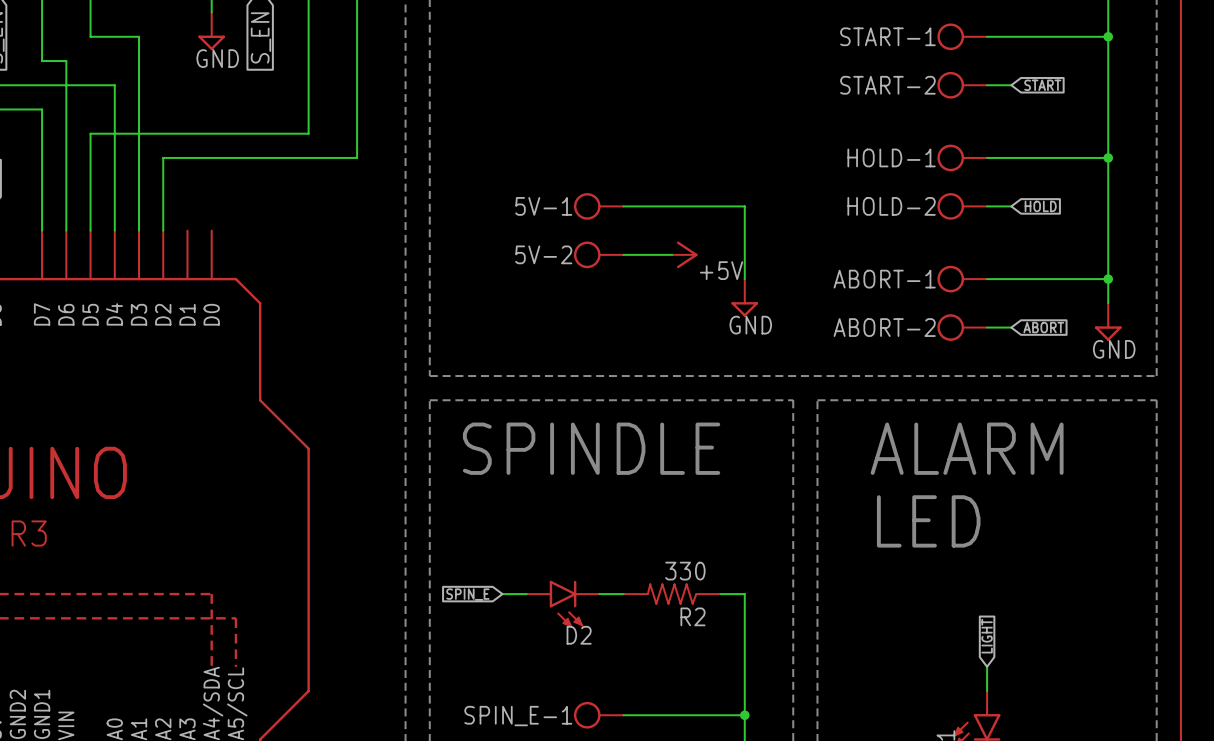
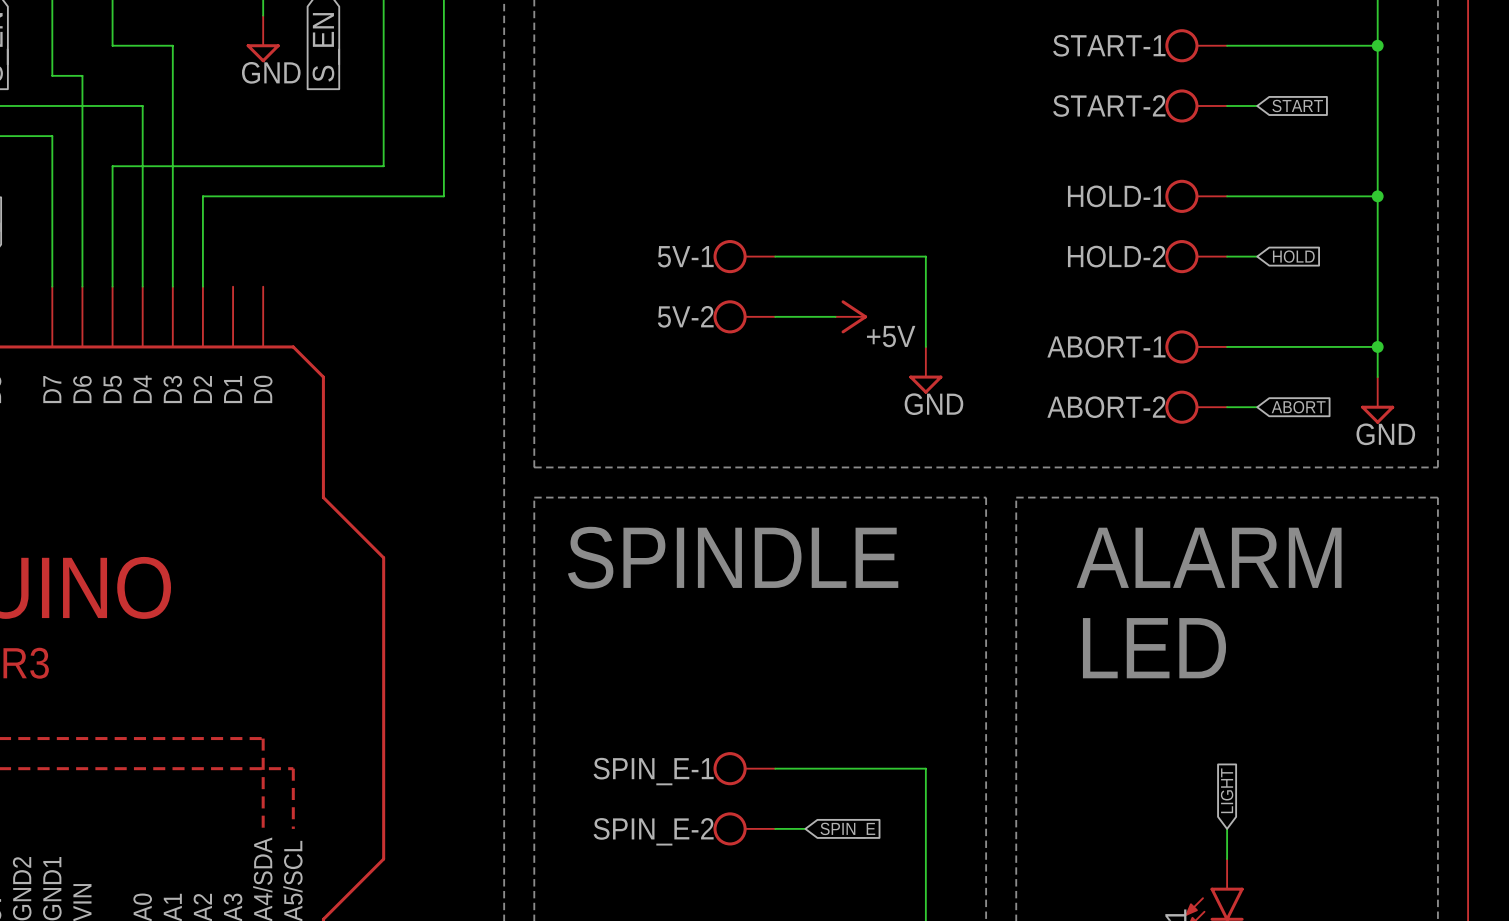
global label rotation: 0° (467, 594) -> 180° (847, 830)
global label position: SPIN_E (467, 594) -> SPIN_E (847, 830)
wire: (502, 594) (526, 594) -> none
wire: (599, 594) (623, 594) -> (775, 828) (805, 828)
R2: 330 (672, 594) -> none
wire: (720, 594) (744, 594) (744, 618) -> (775, 768) (925, 768)
D2: (563, 604) -> none
SPIN_E-2: none -> (744, 828)
SPIN_E-1 position: (598, 715) -> (744, 768)
wire: (623, 715) (744, 715) -> none
junction: (744, 715) -> none

